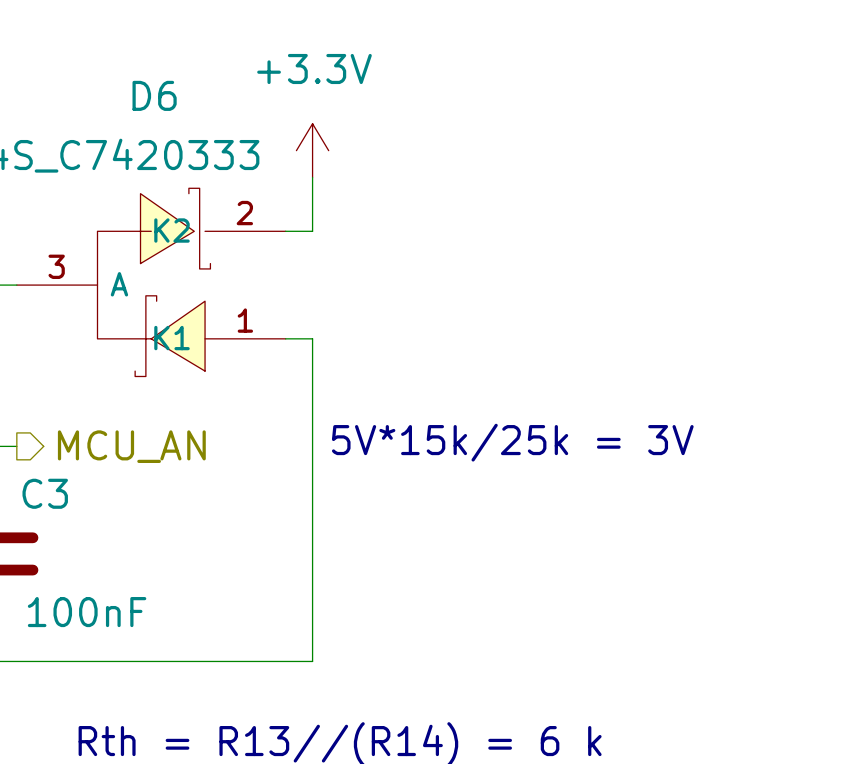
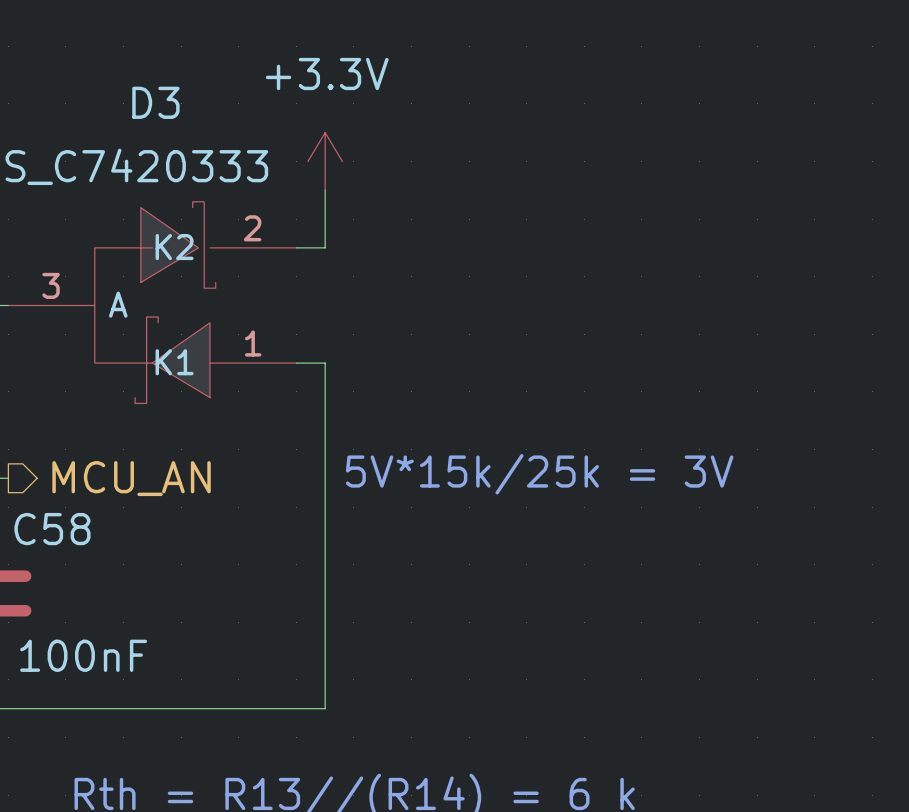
D6 name: D6 (154, 95) -> D3 (155, 102)
C3 name: C3 (45, 493) -> C58 (52, 529)

